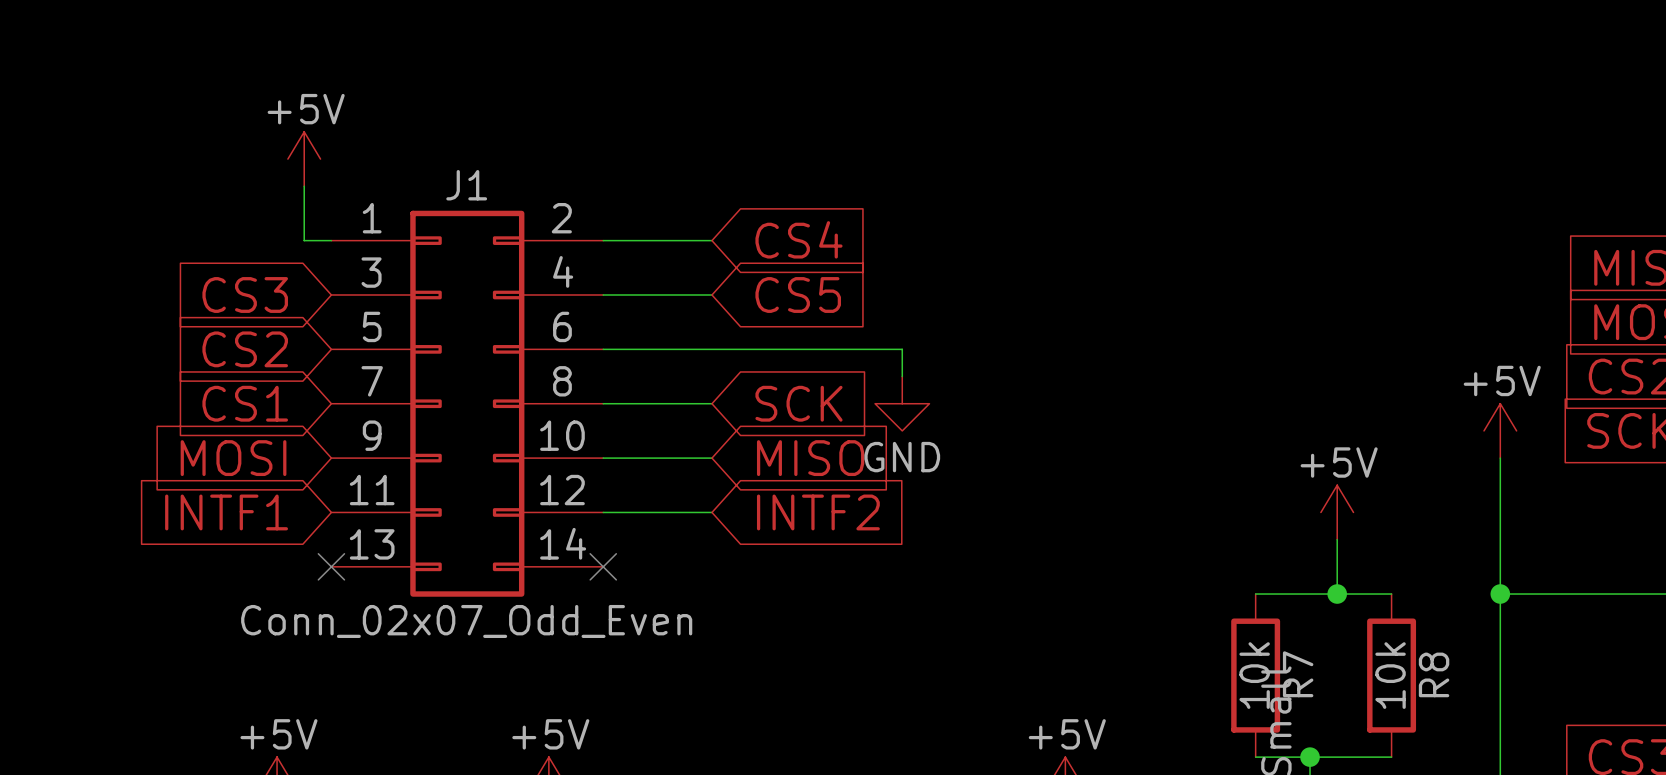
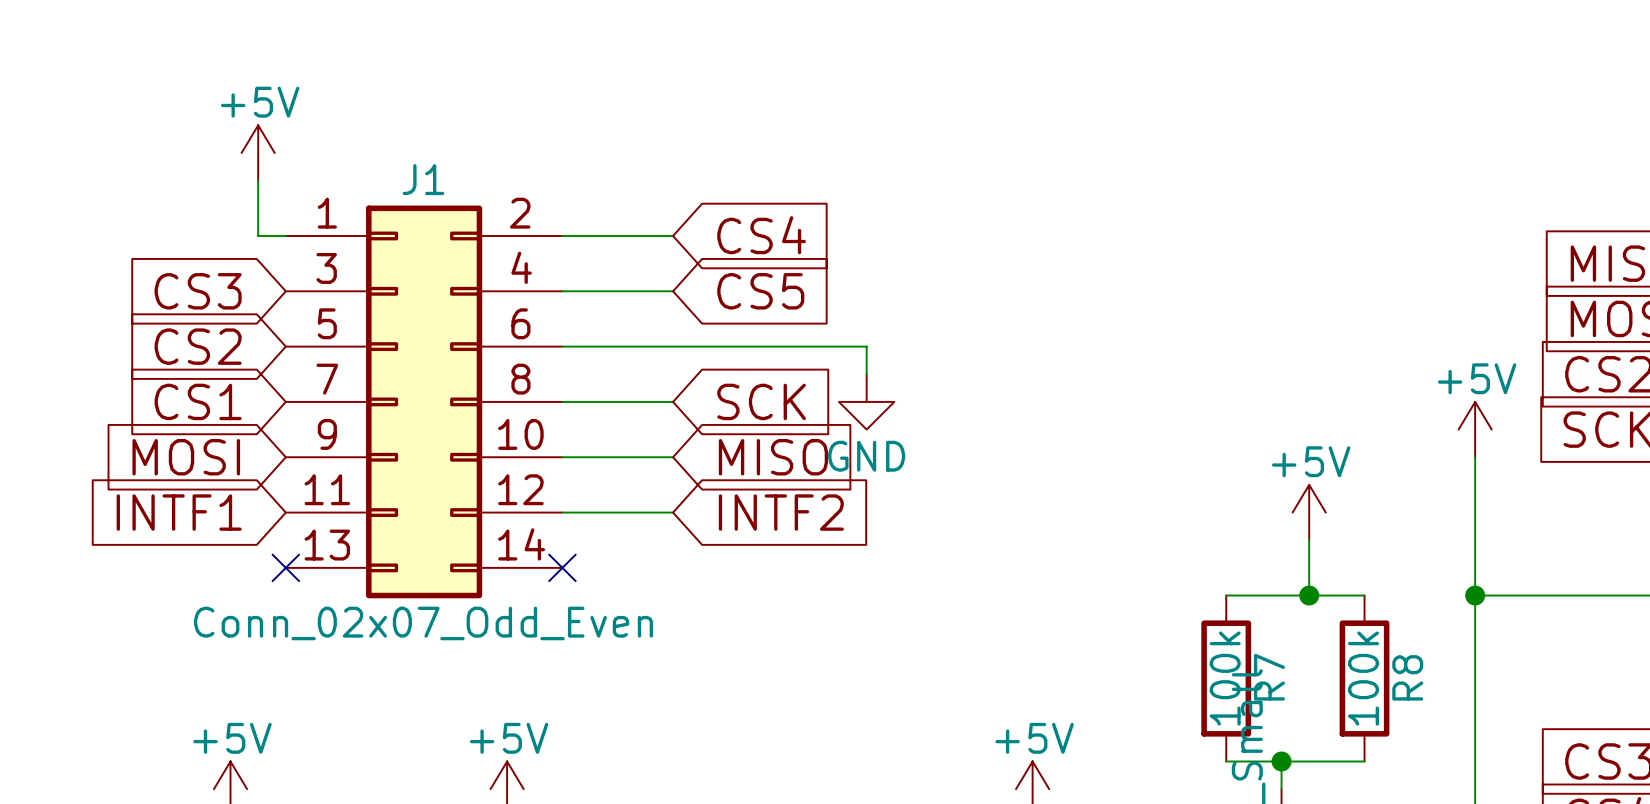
R7 value: 10k (1254, 675) -> 100k (1225, 678)
R8 value: 10k (1390, 675) -> 100k (1363, 678)

